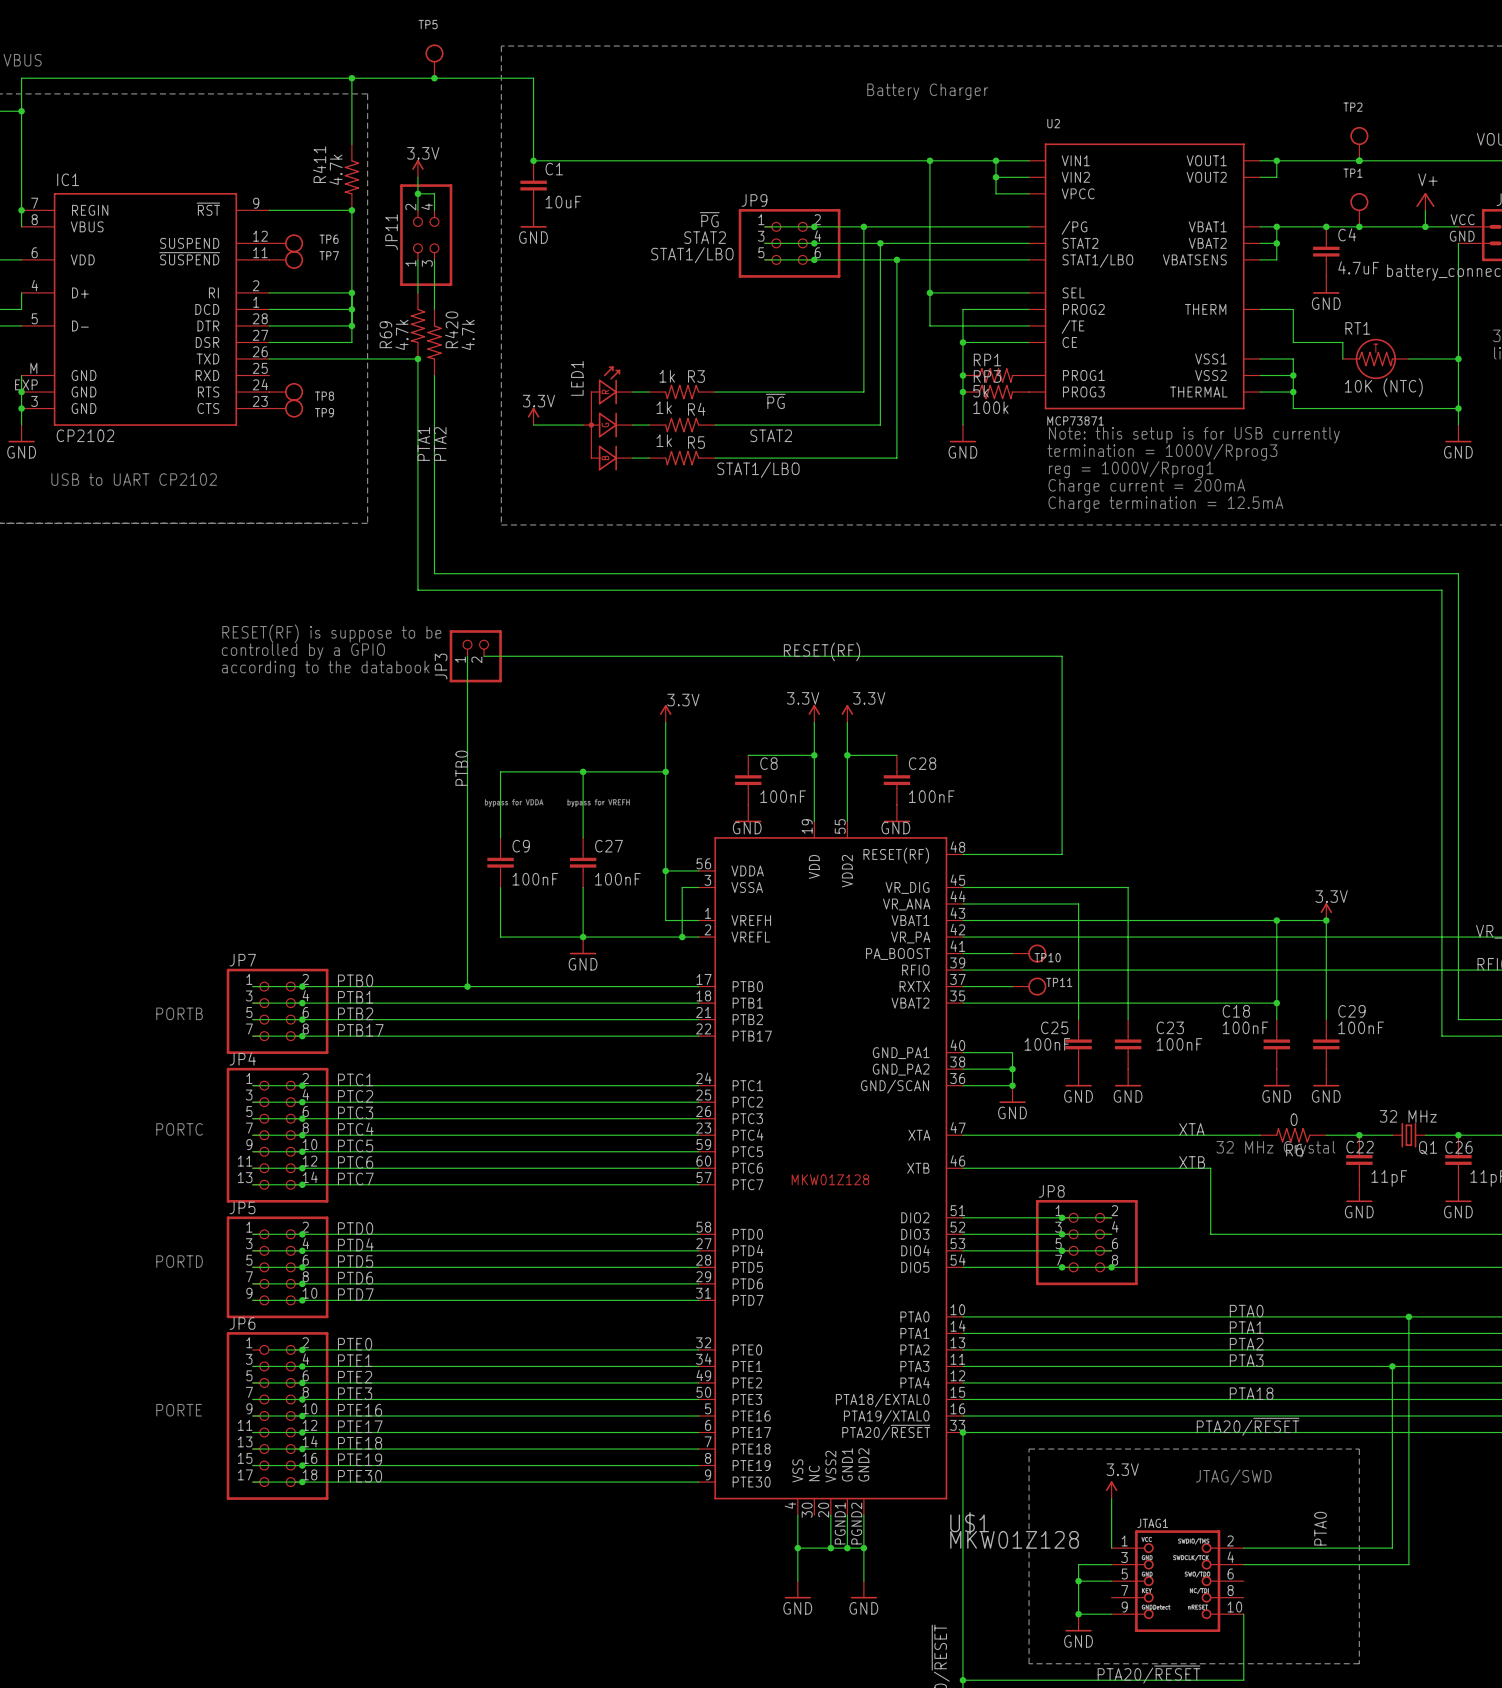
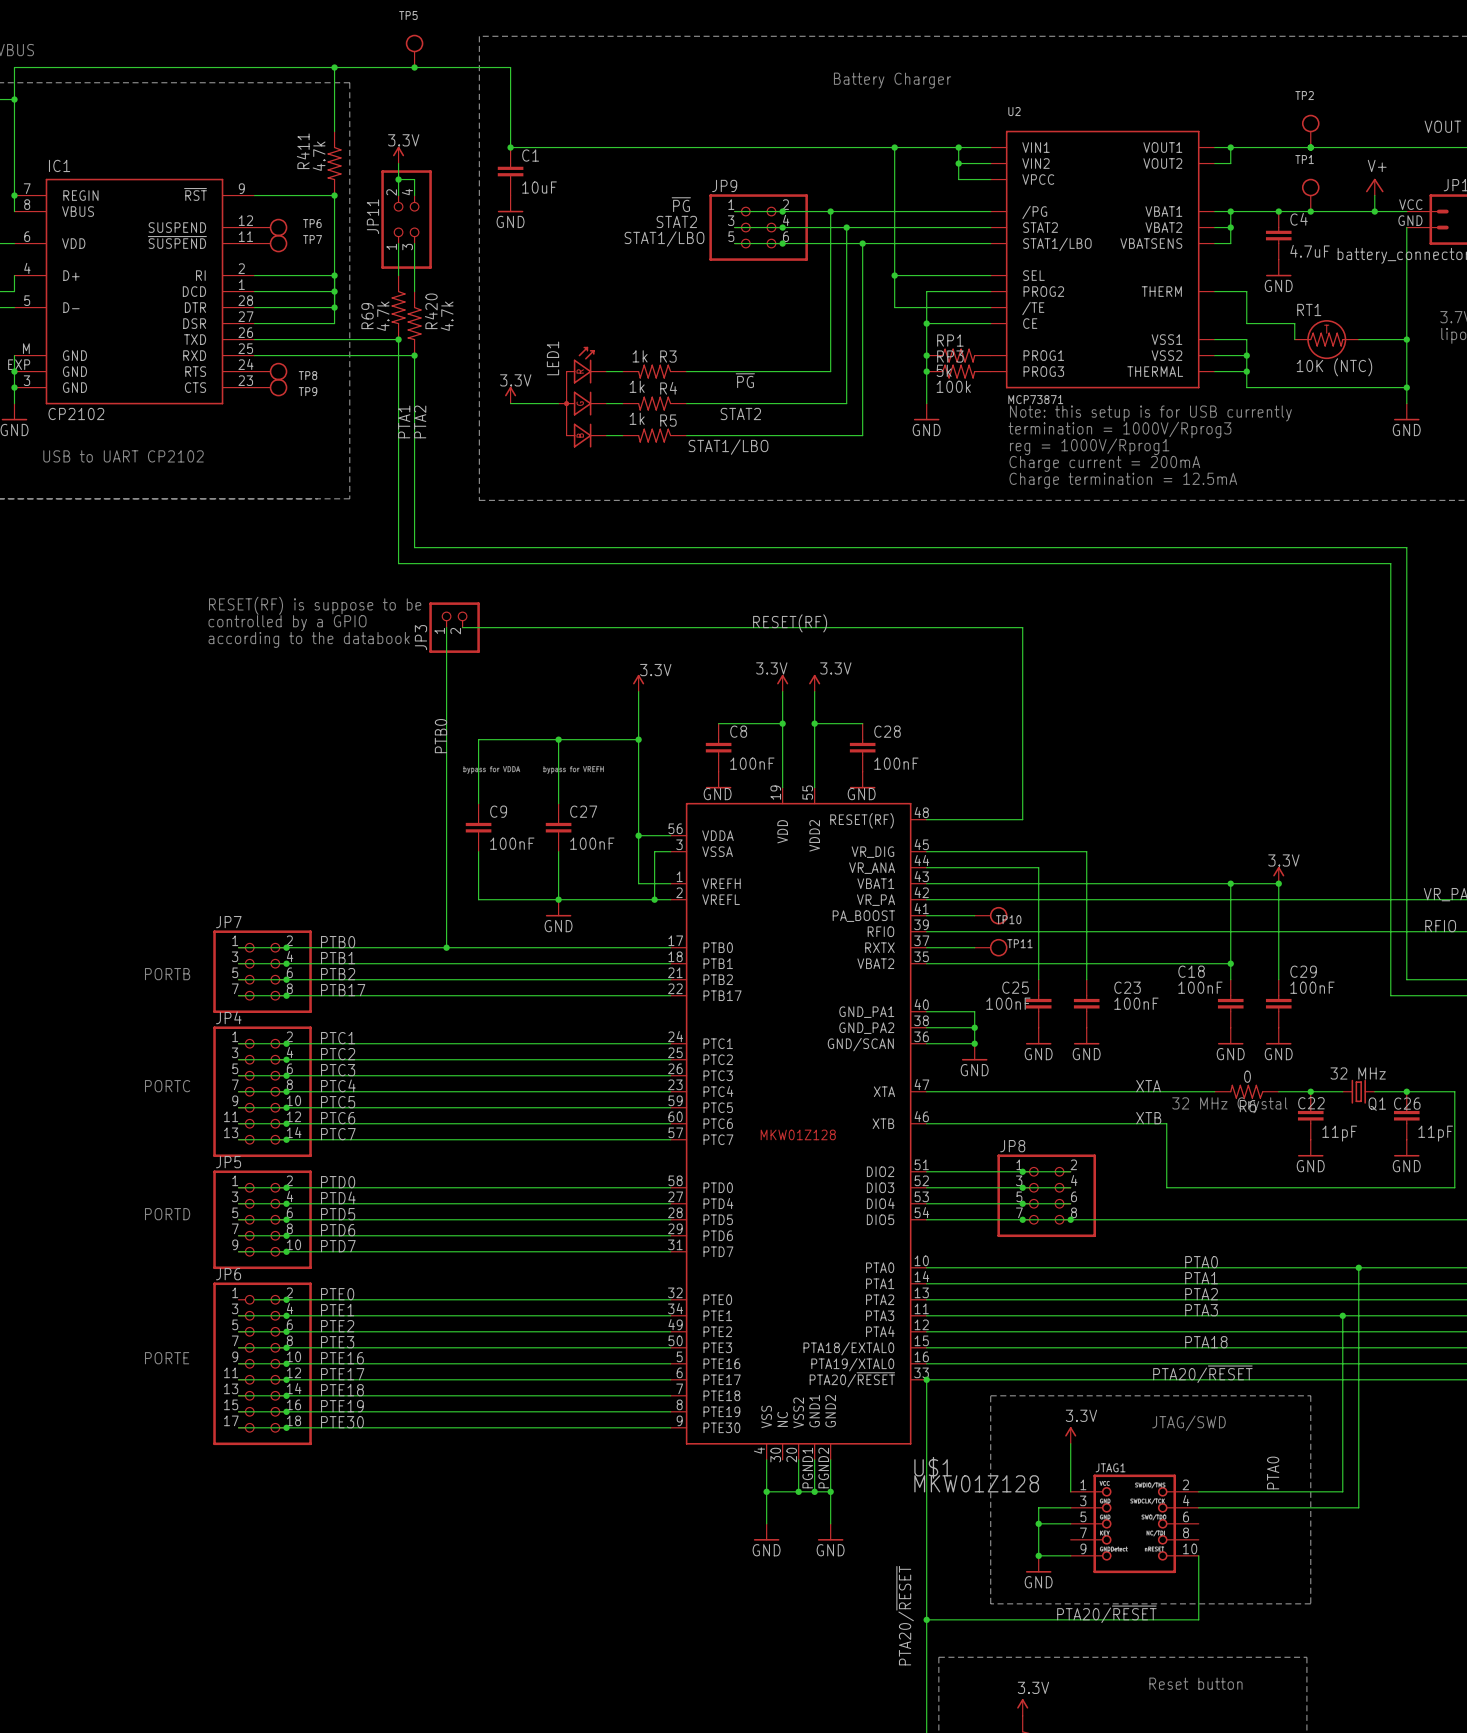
wire: none -> (254, 355) (414, 355)
junction: none -> (414, 355)

